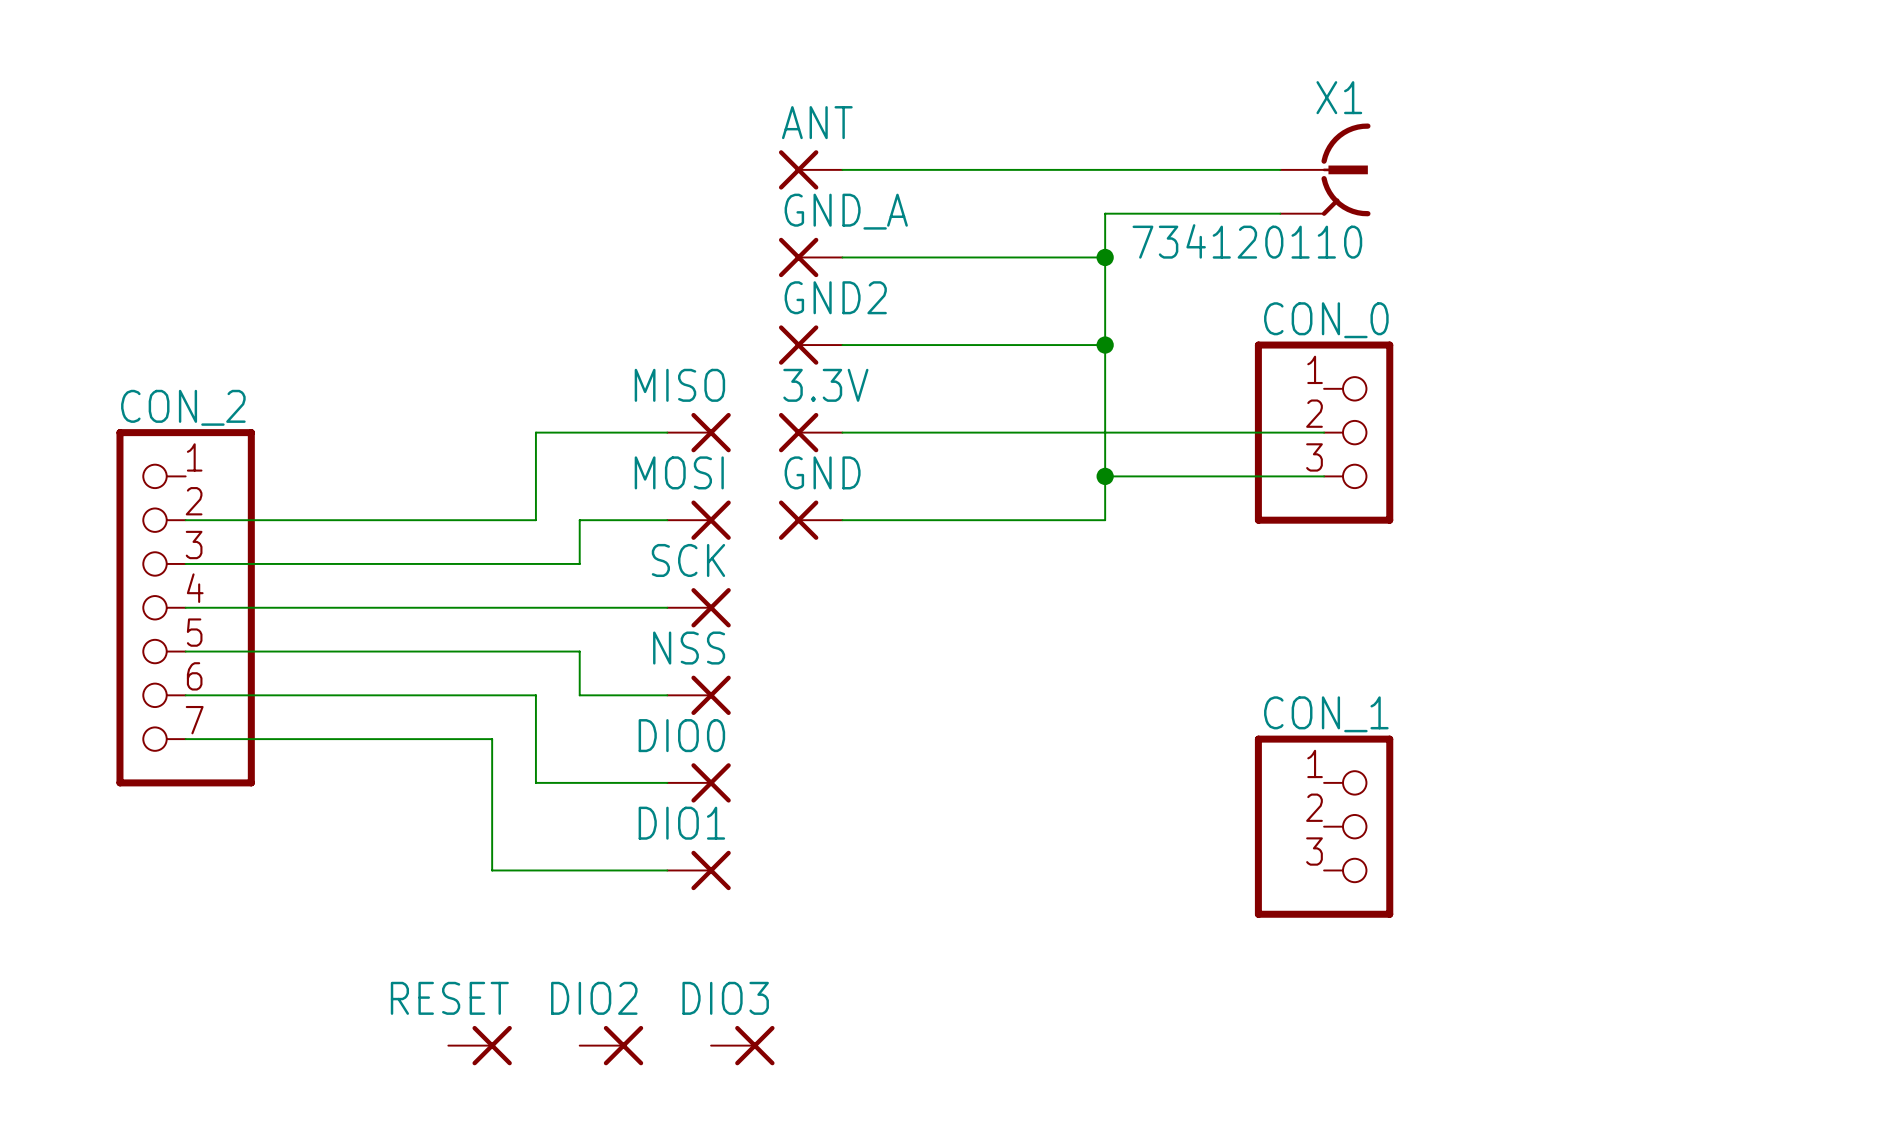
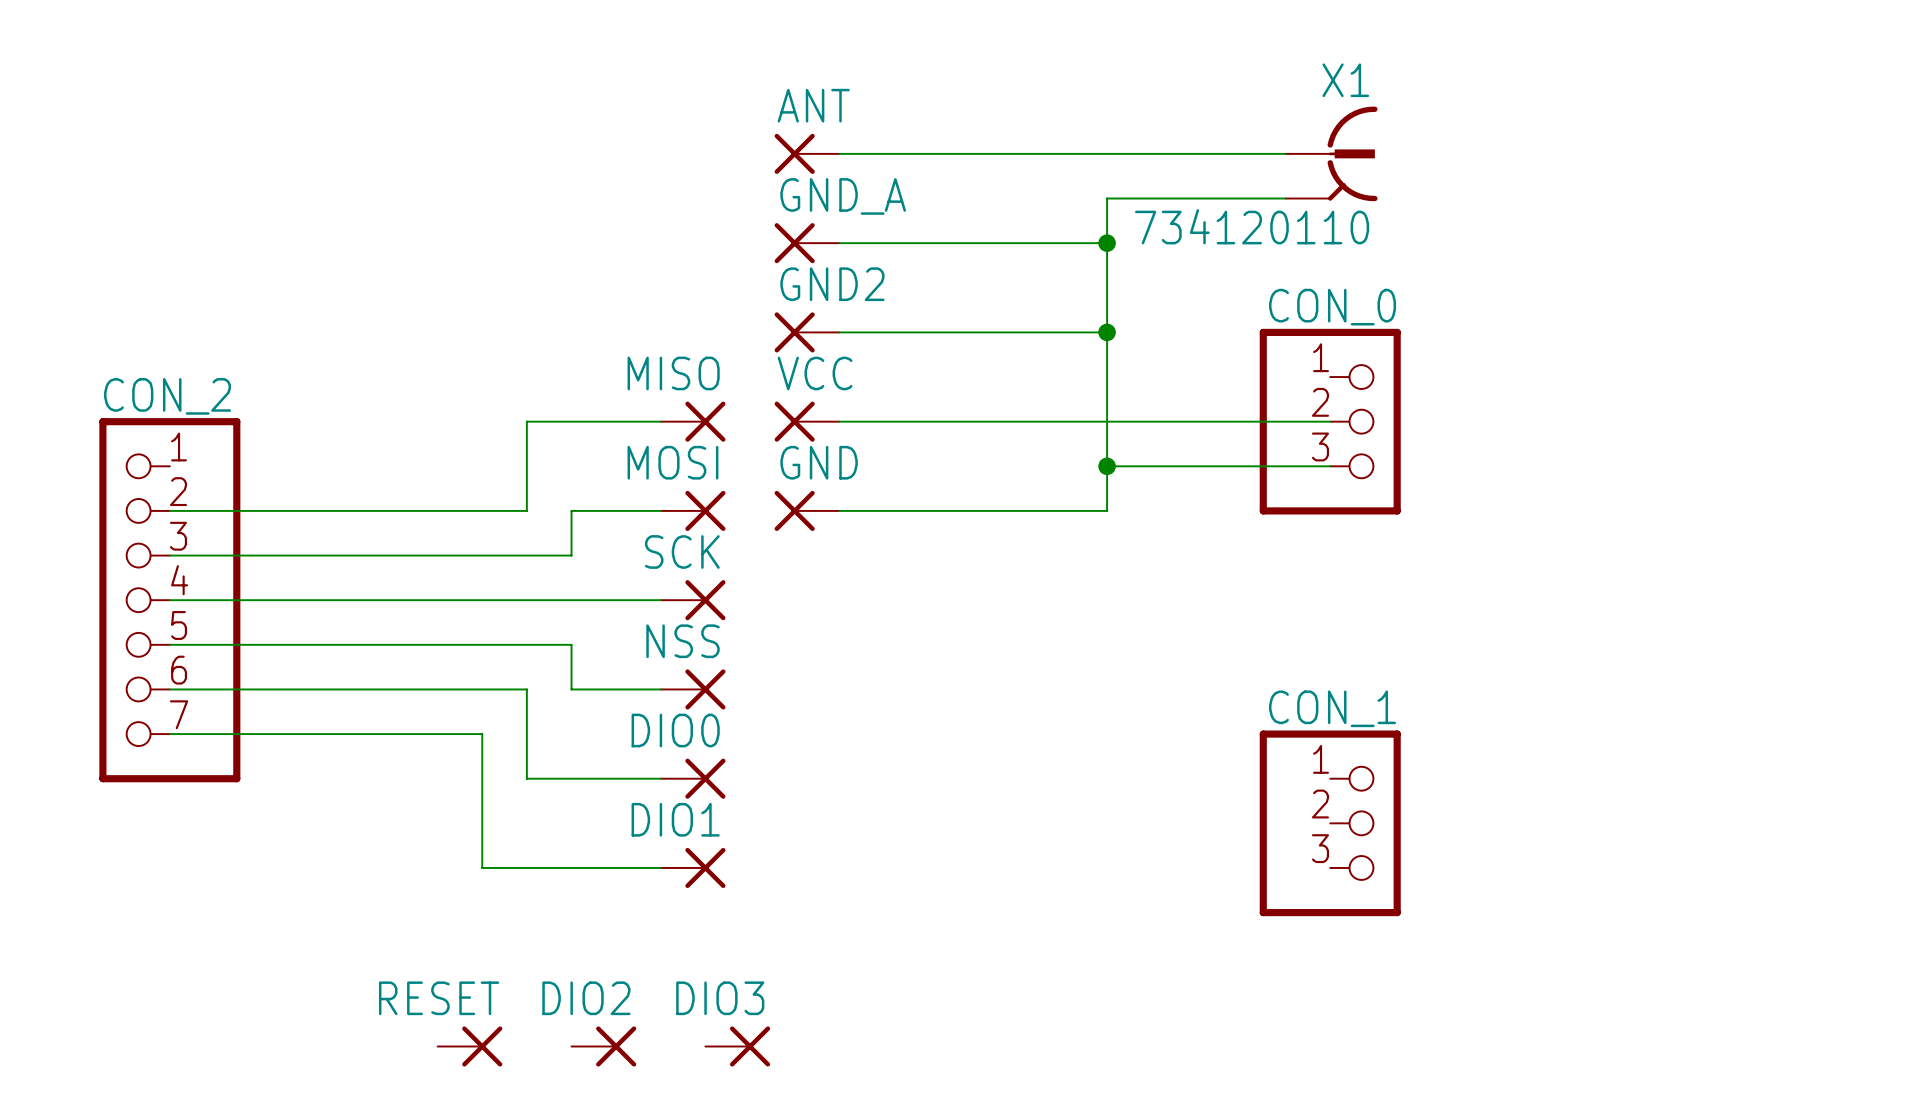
3.3V name: 3.3V (825, 385) -> VCC (815, 373)

